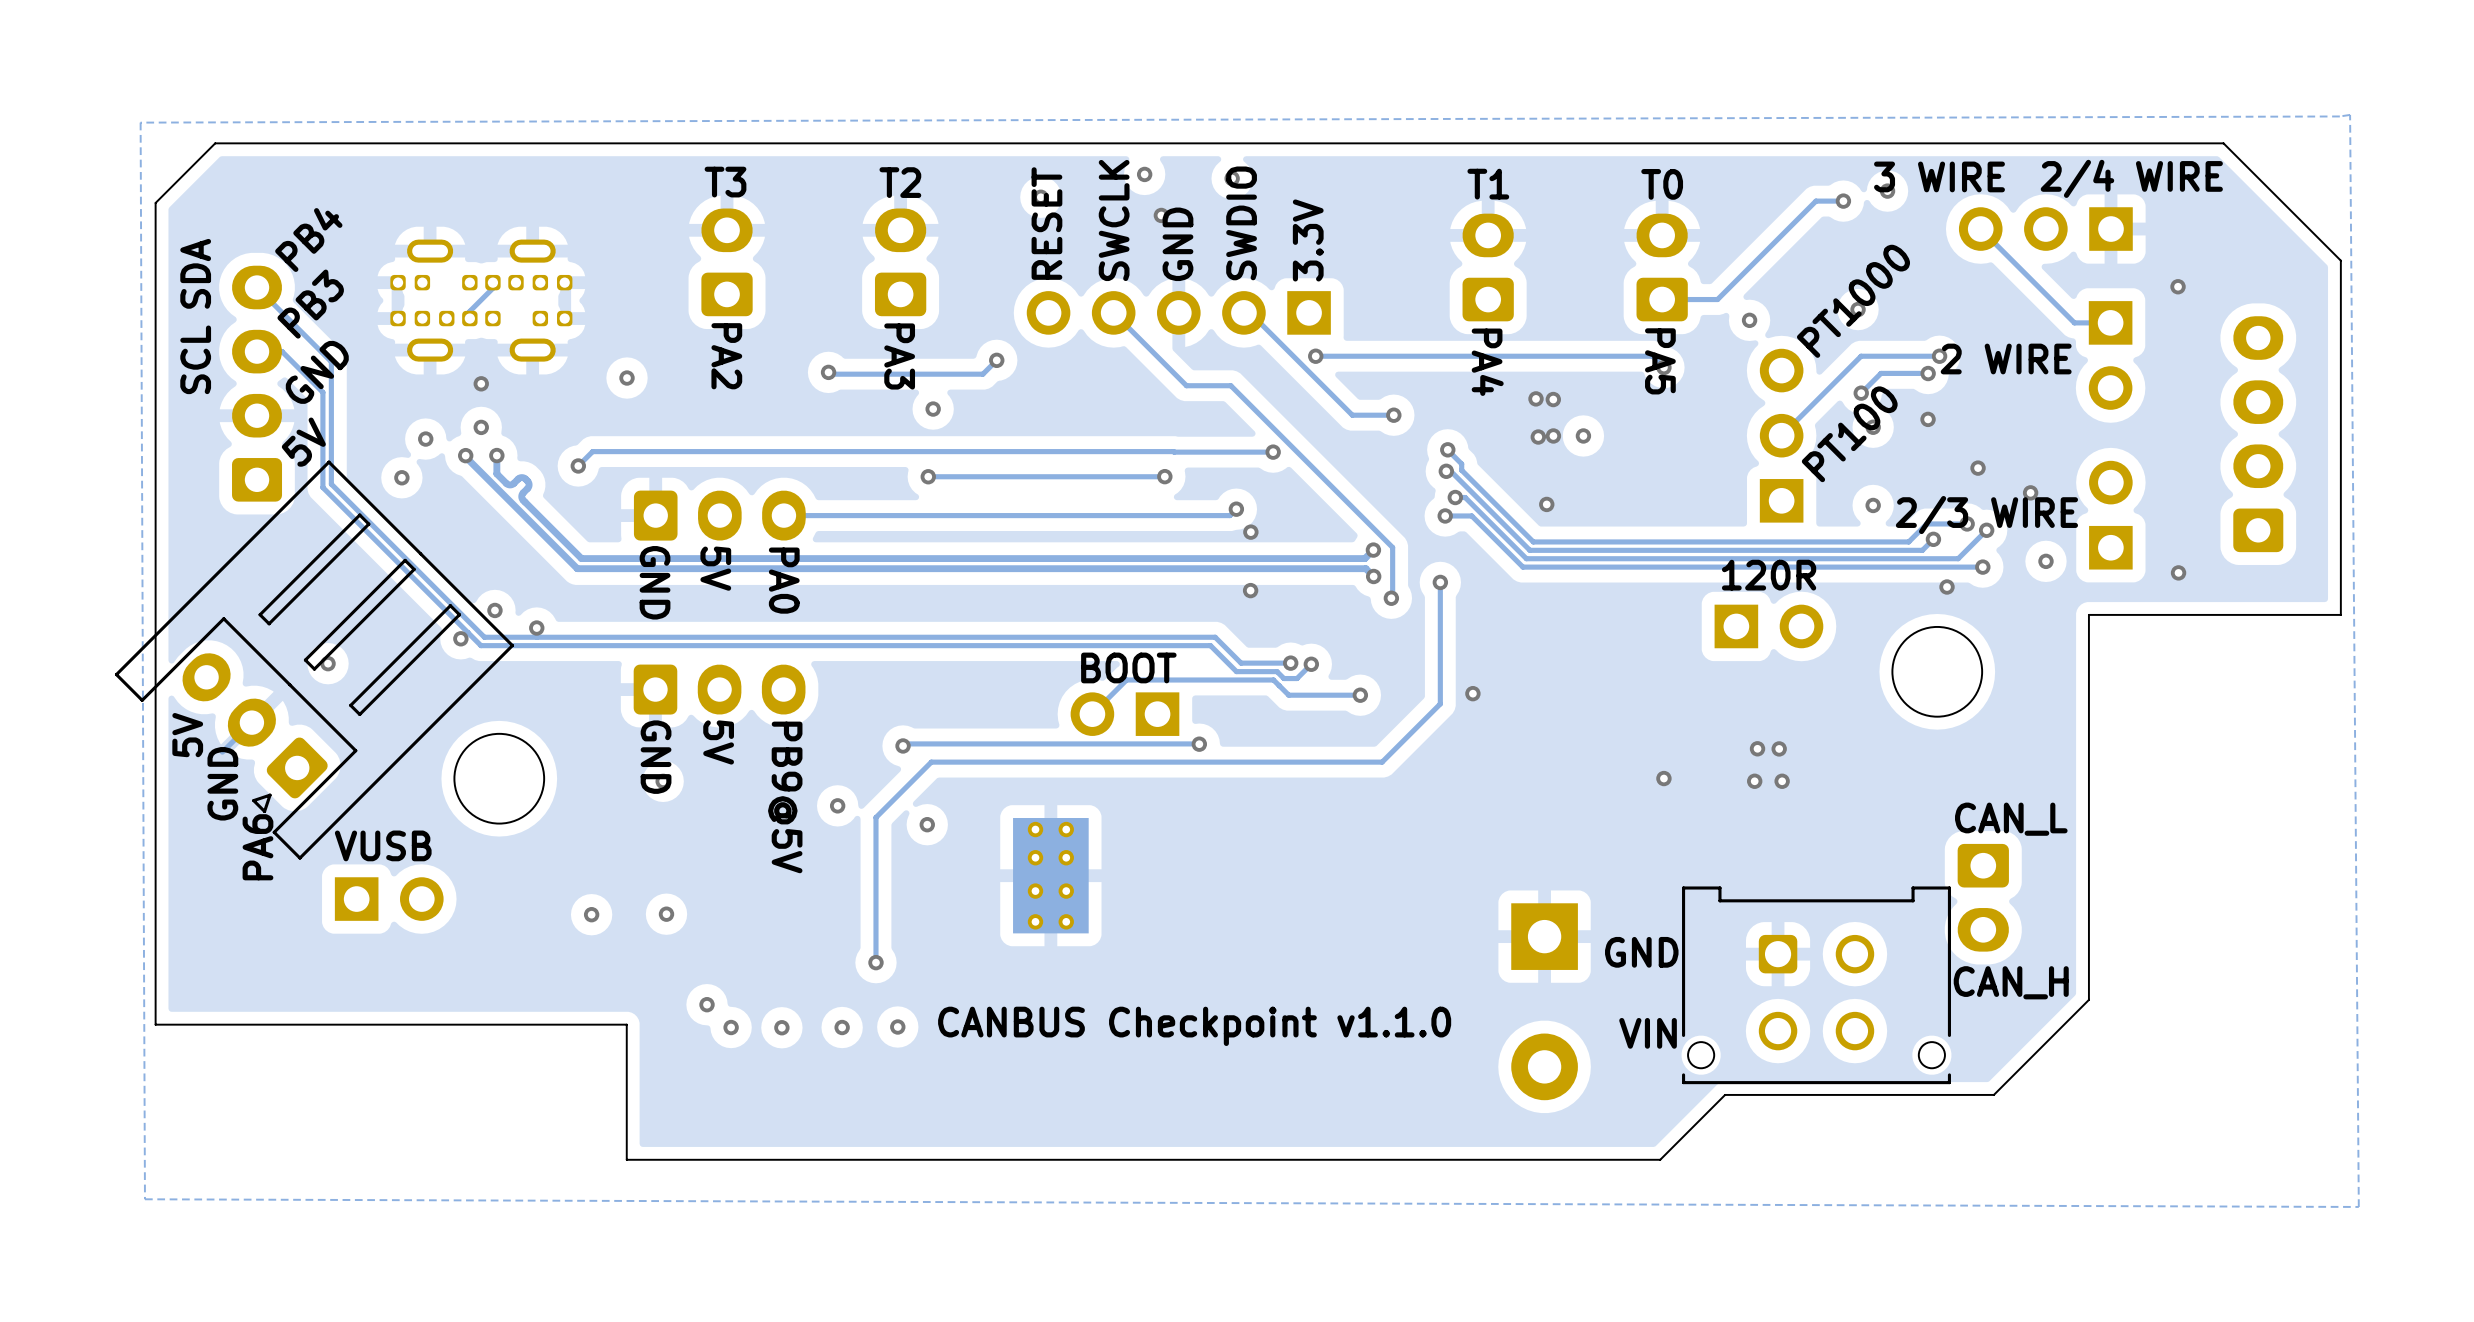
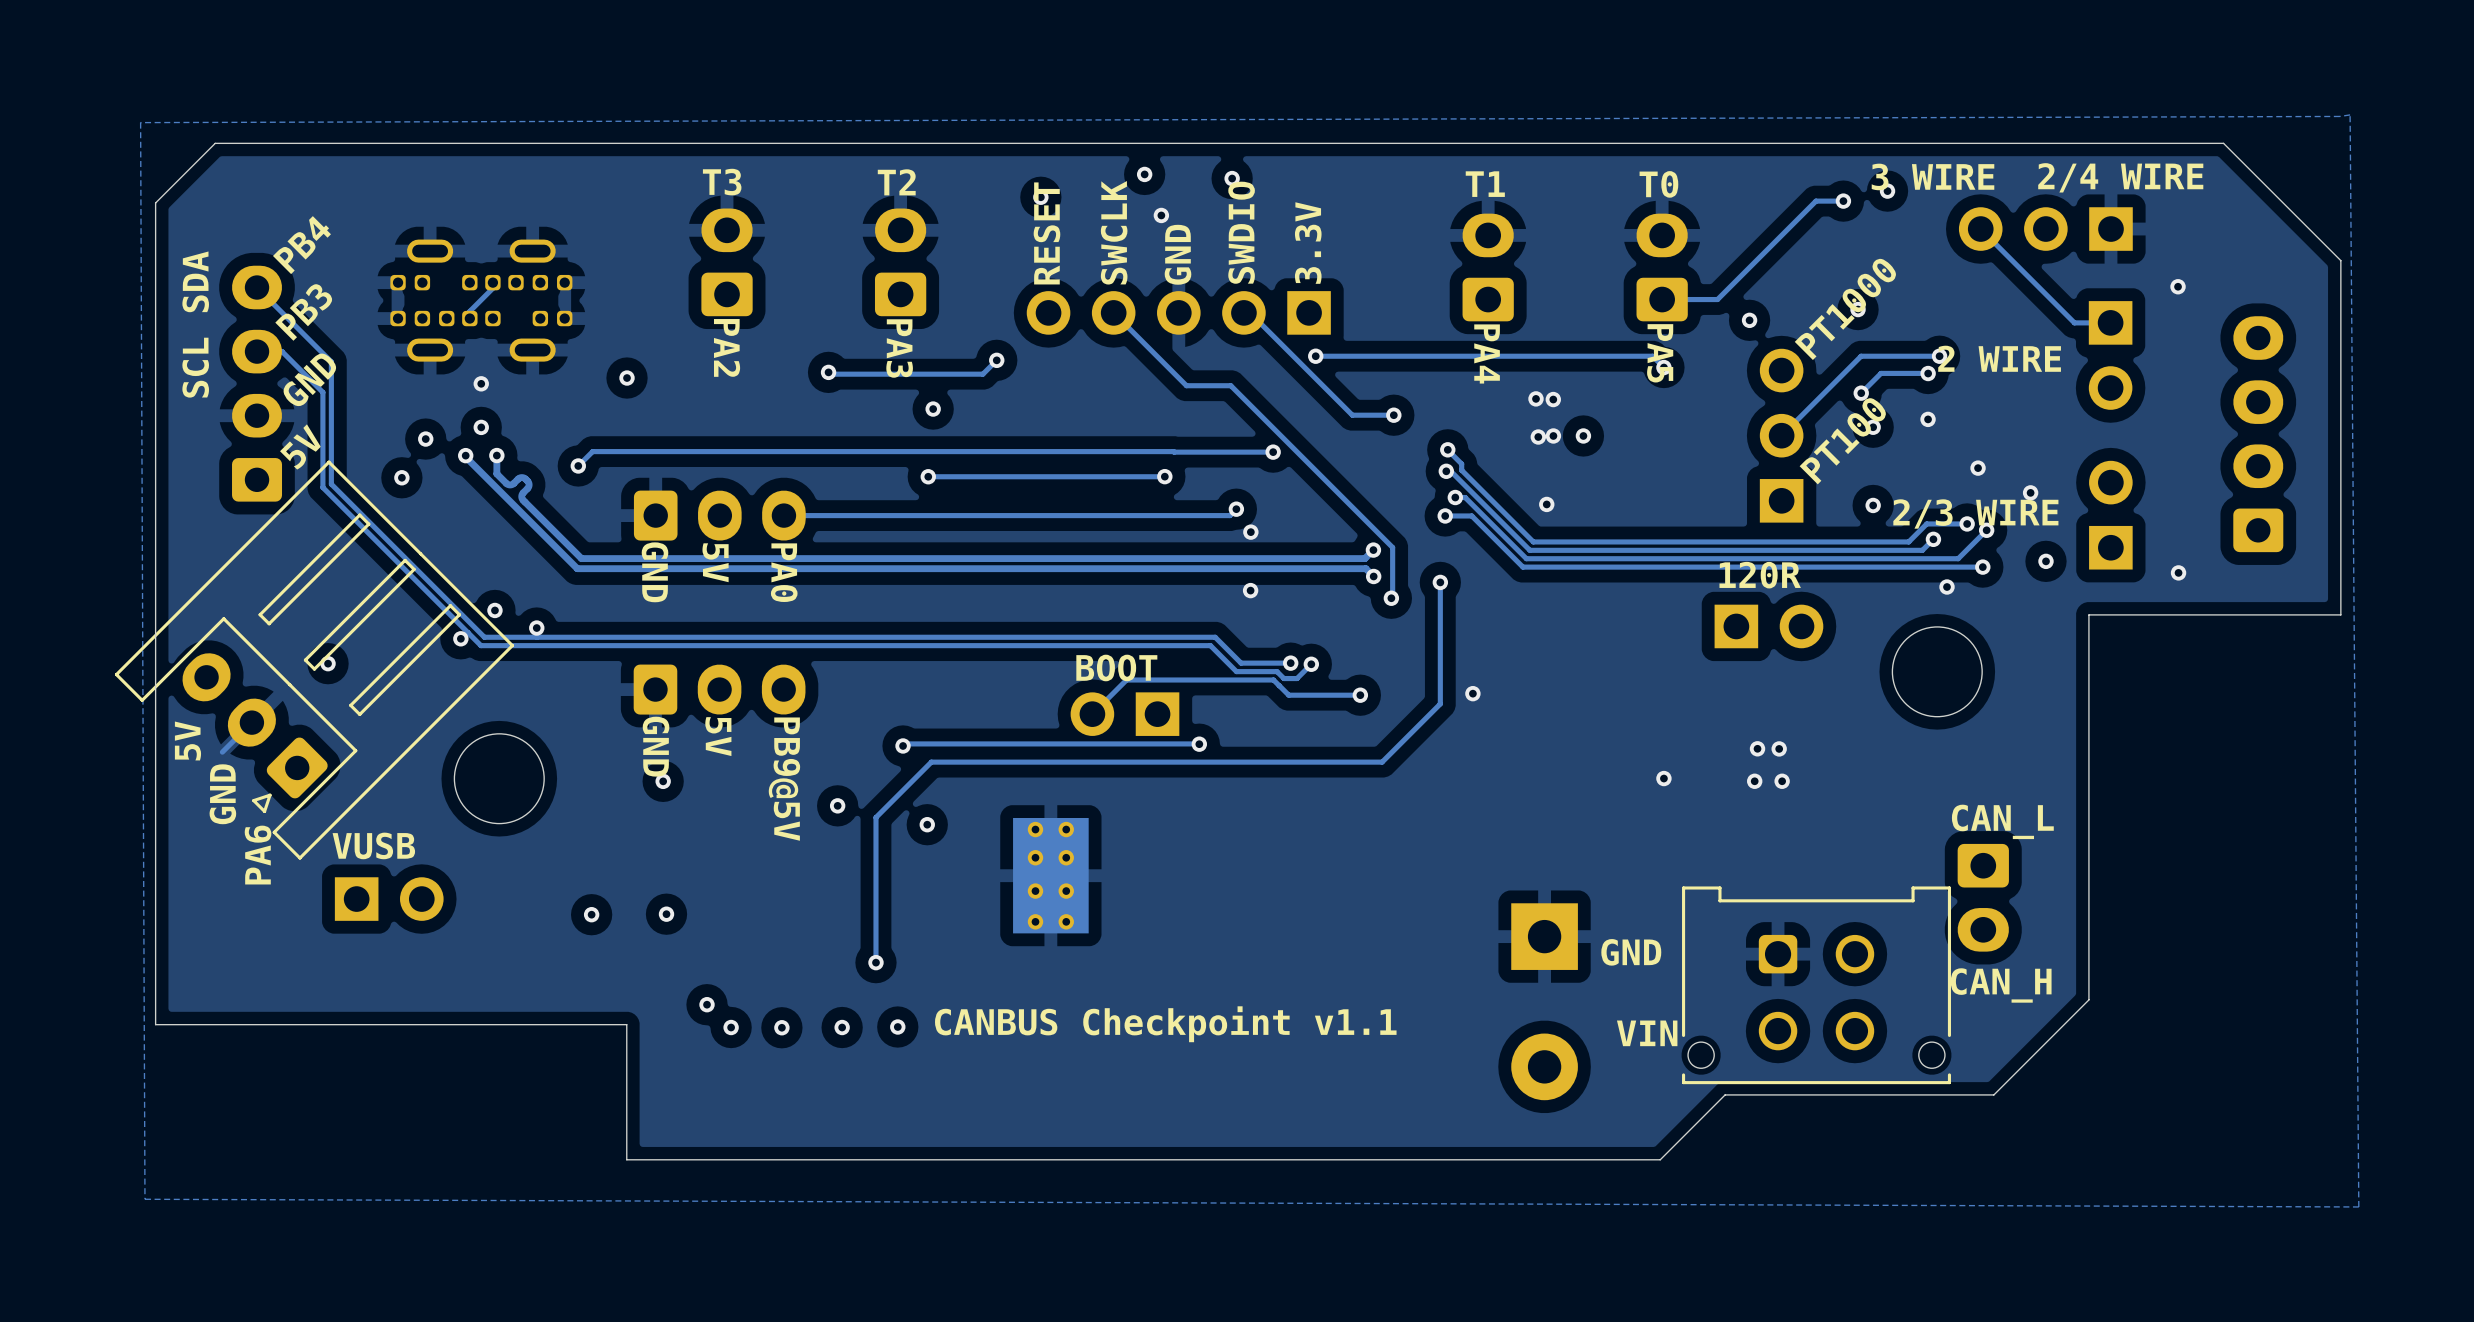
text: CANBUS Checkpoint v1.1.0 (1194, 1026) -> CANBUS Checkpoint v1.1 (1165, 1024)

